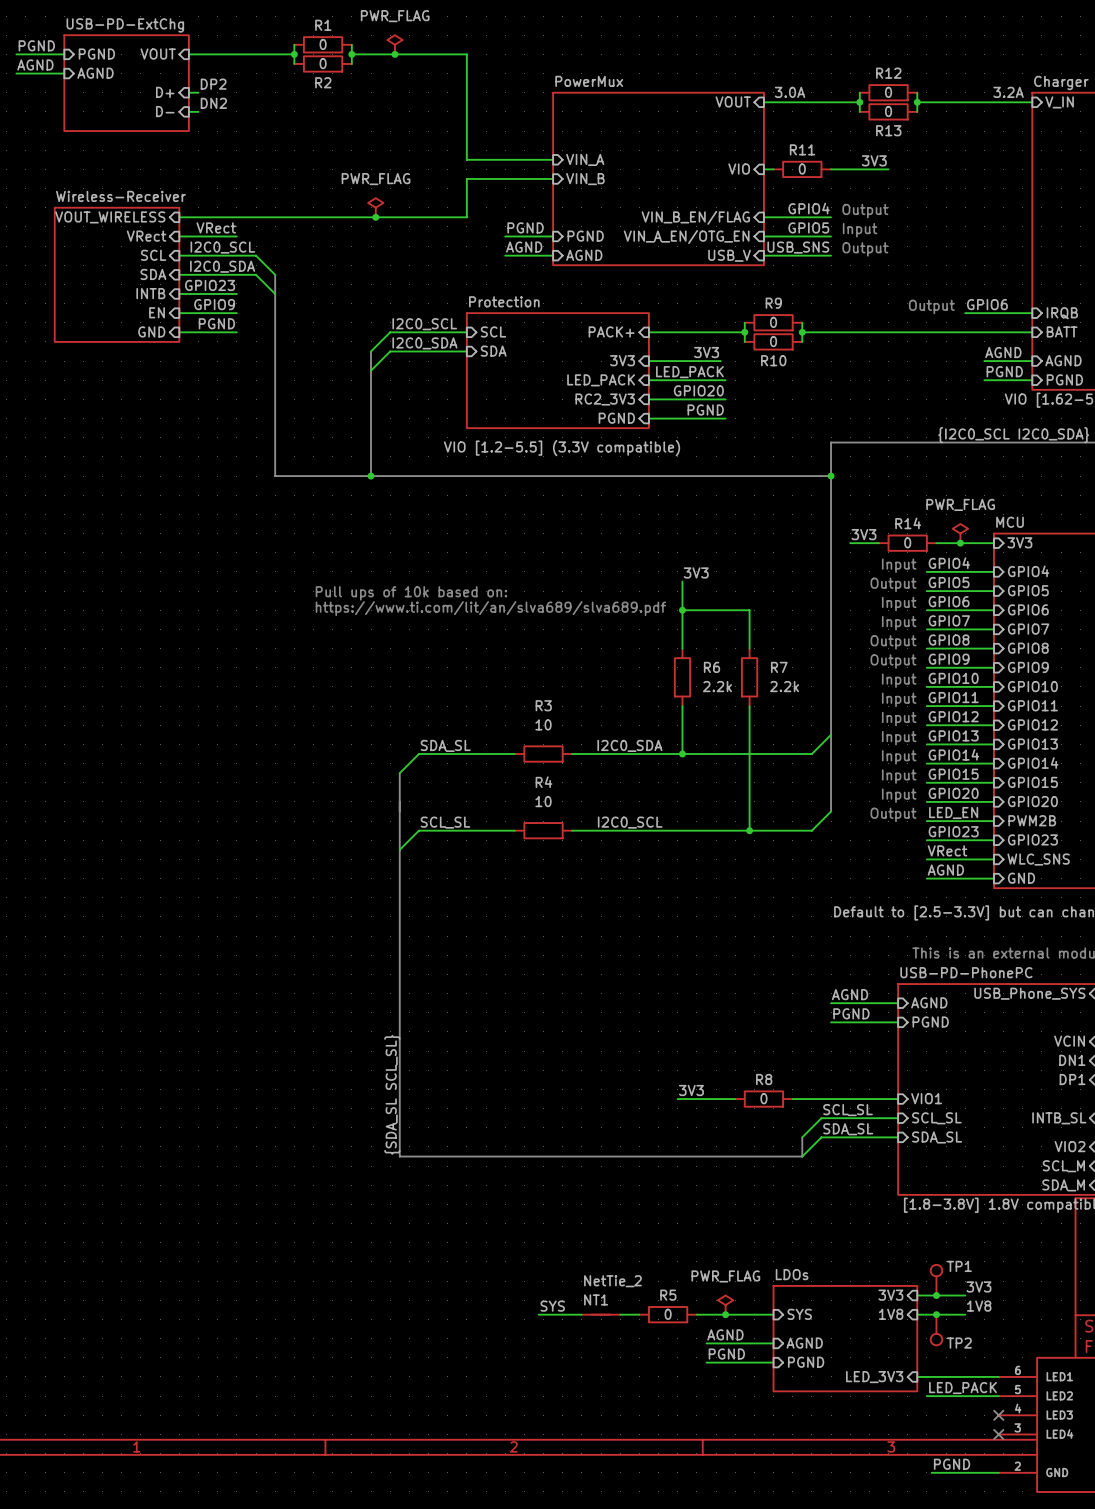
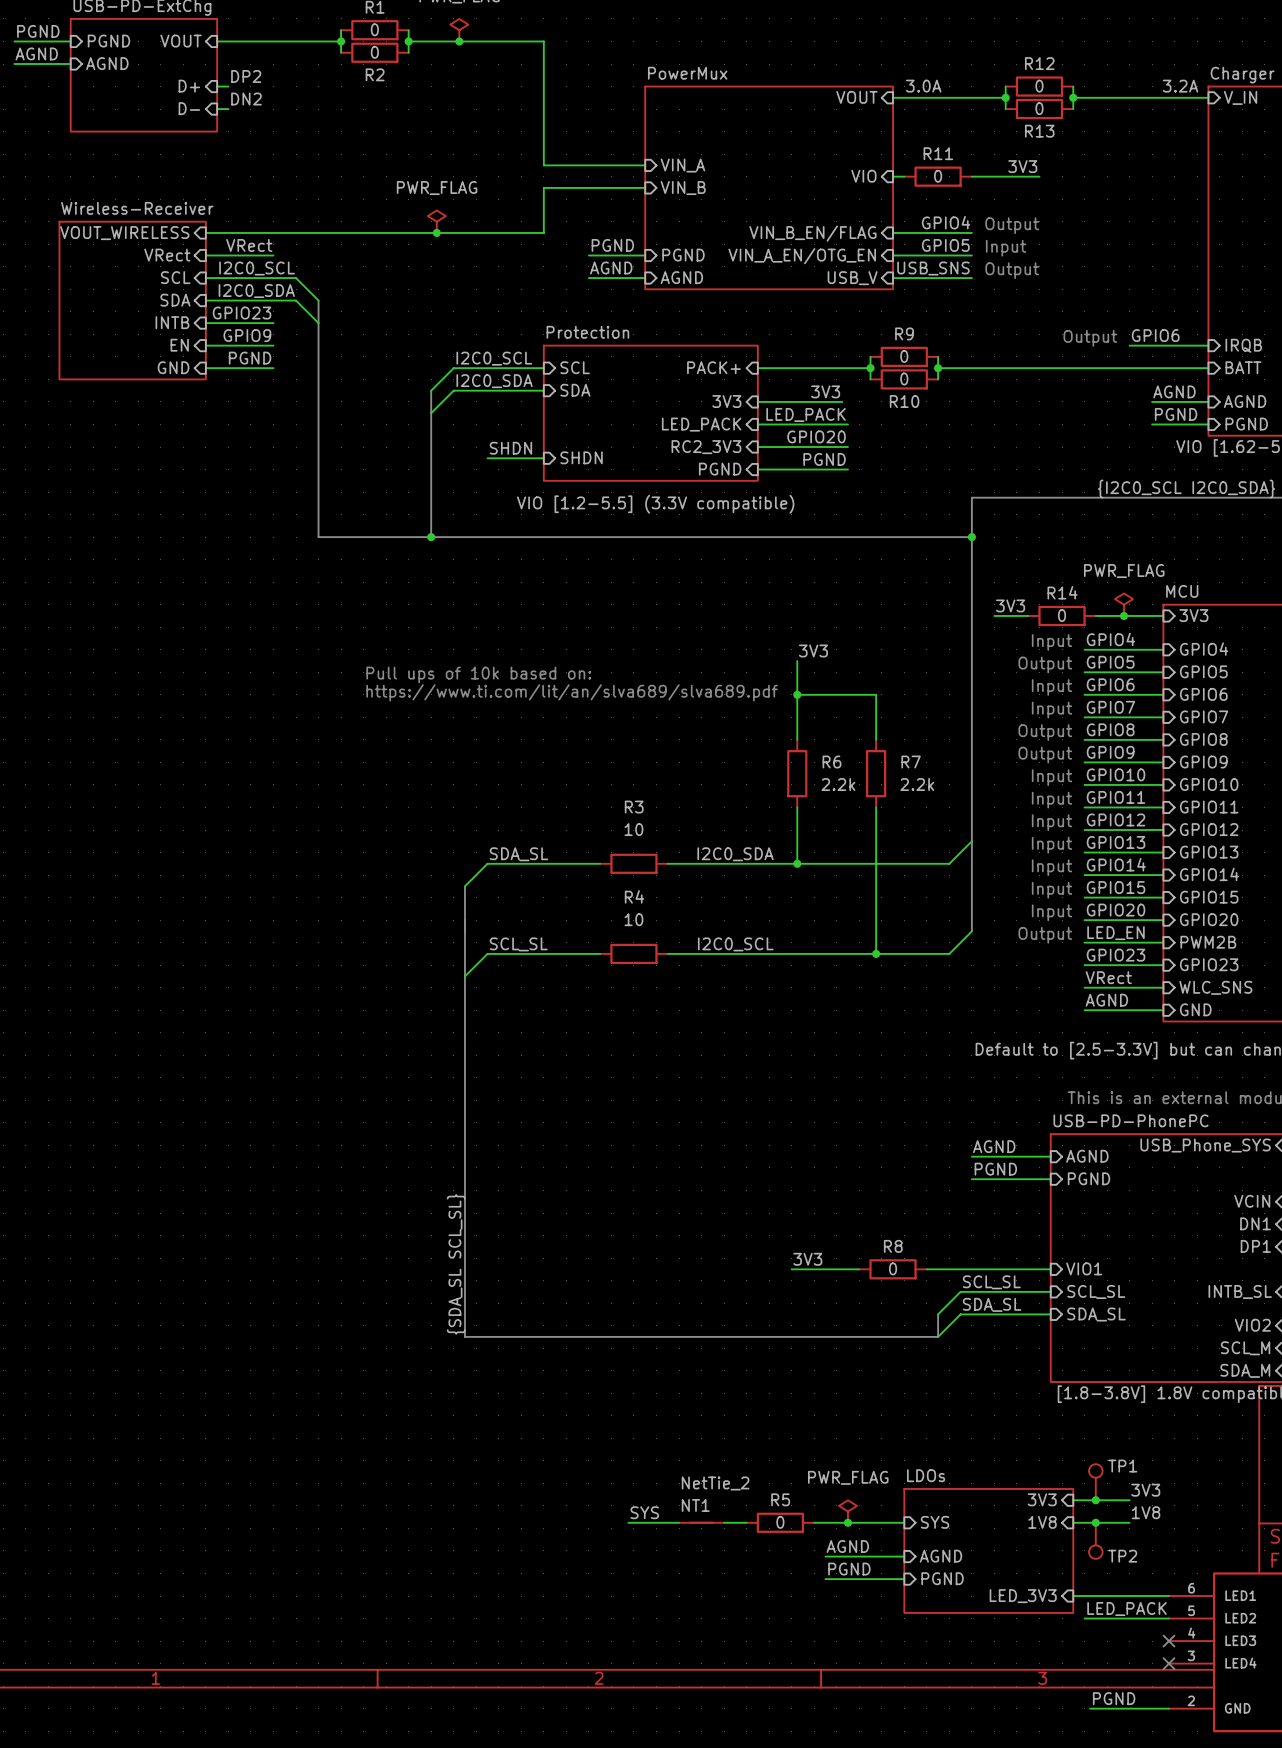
label: none -> SHDN (510, 448)
wire: none -> (487, 458) (543, 458)
sheet pin: none -> SHDN (581, 457)

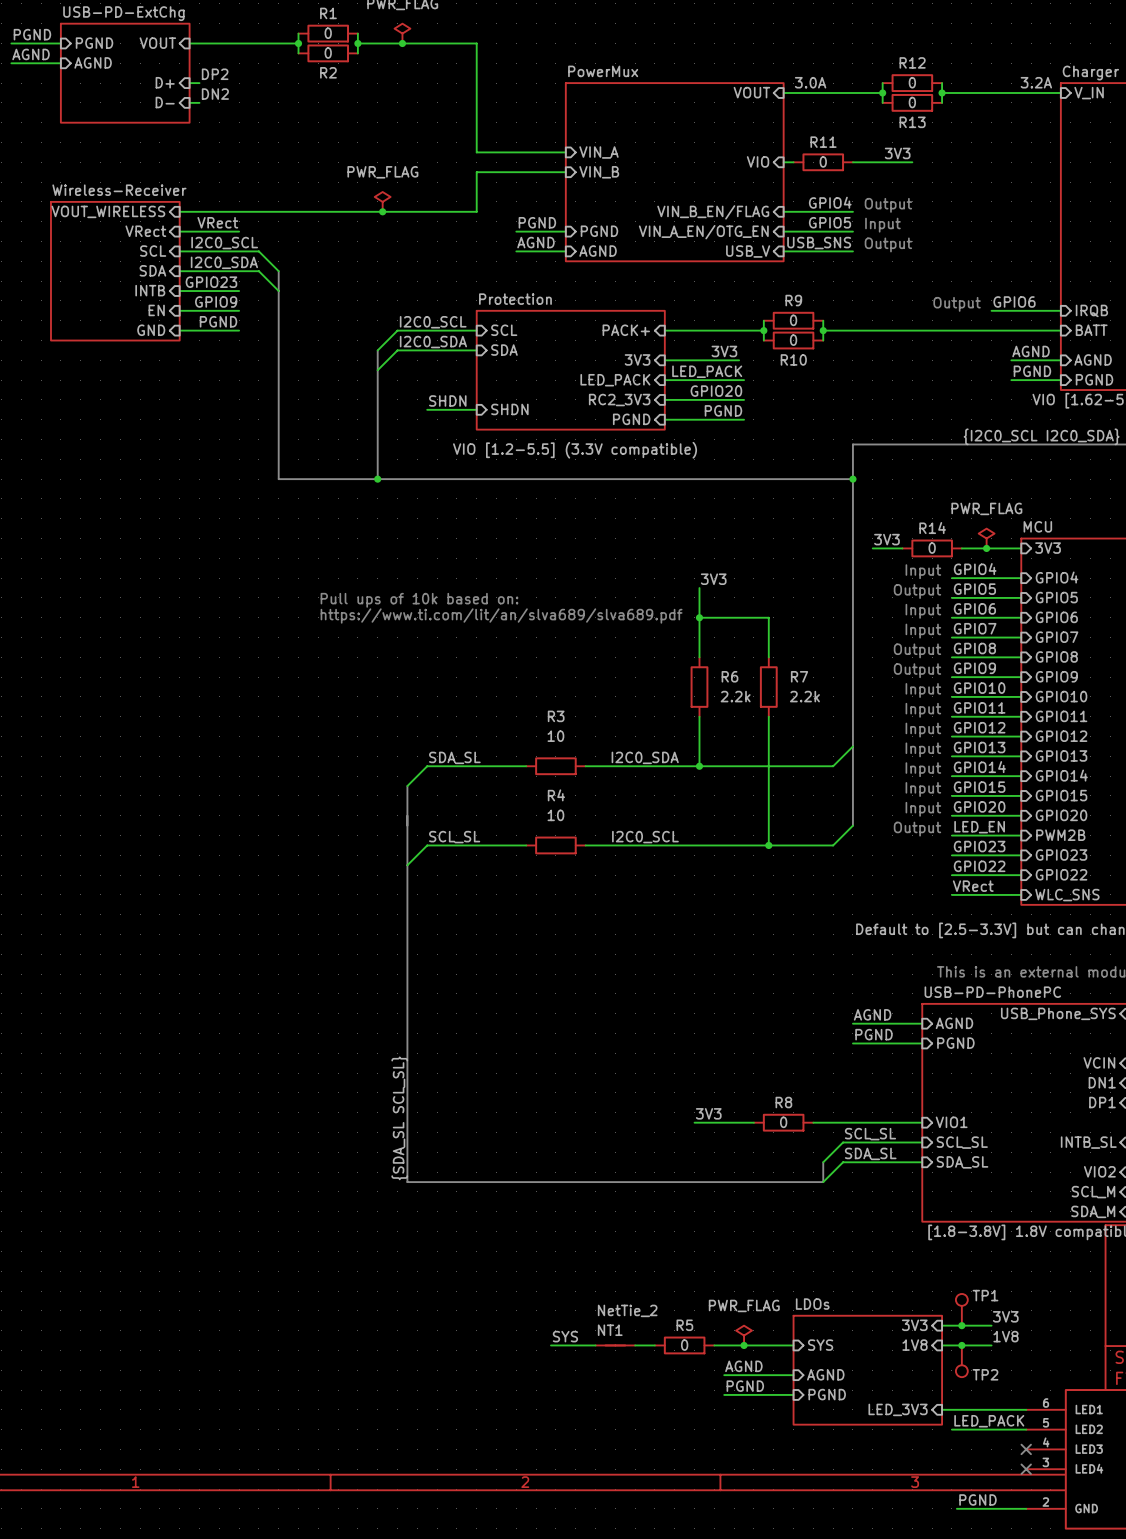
label: VRect (1108, 977) -> GPIO22 (979, 866)
sheet pin: WLC_SNS (1215, 987) -> GPIO22 (1061, 874)
label: AGND (1106, 1000) -> VRect (973, 886)
sheet pin: GND (1195, 1009) -> WLC_SNS (1067, 895)

